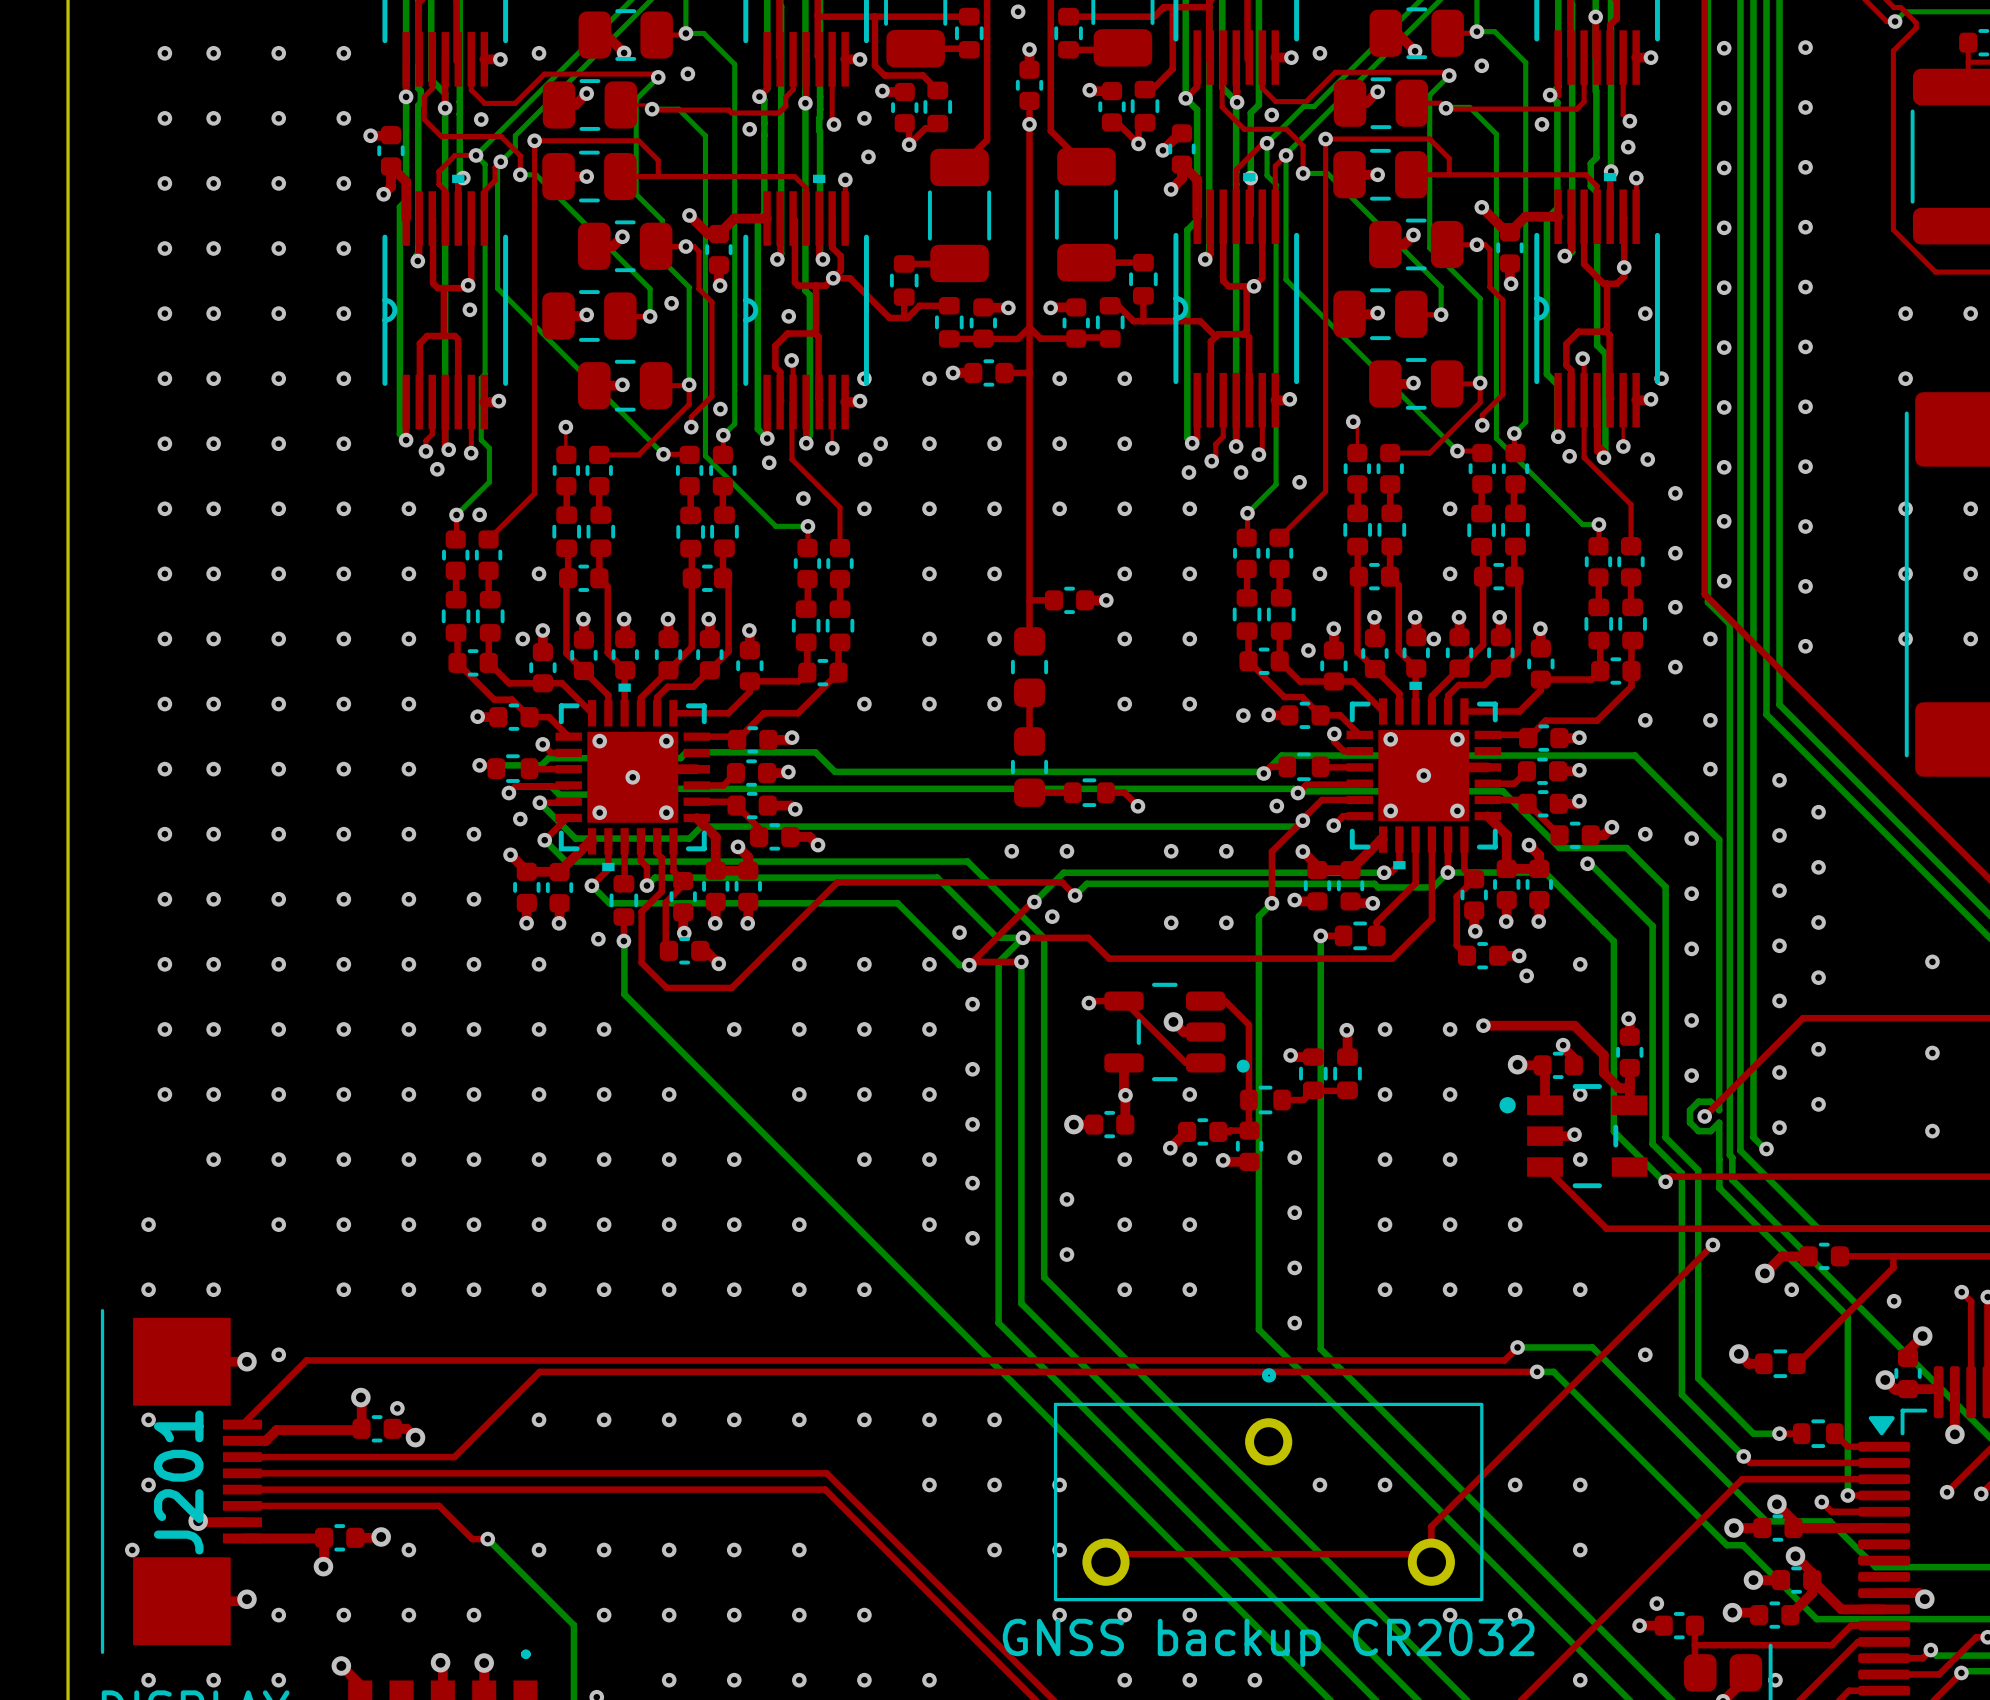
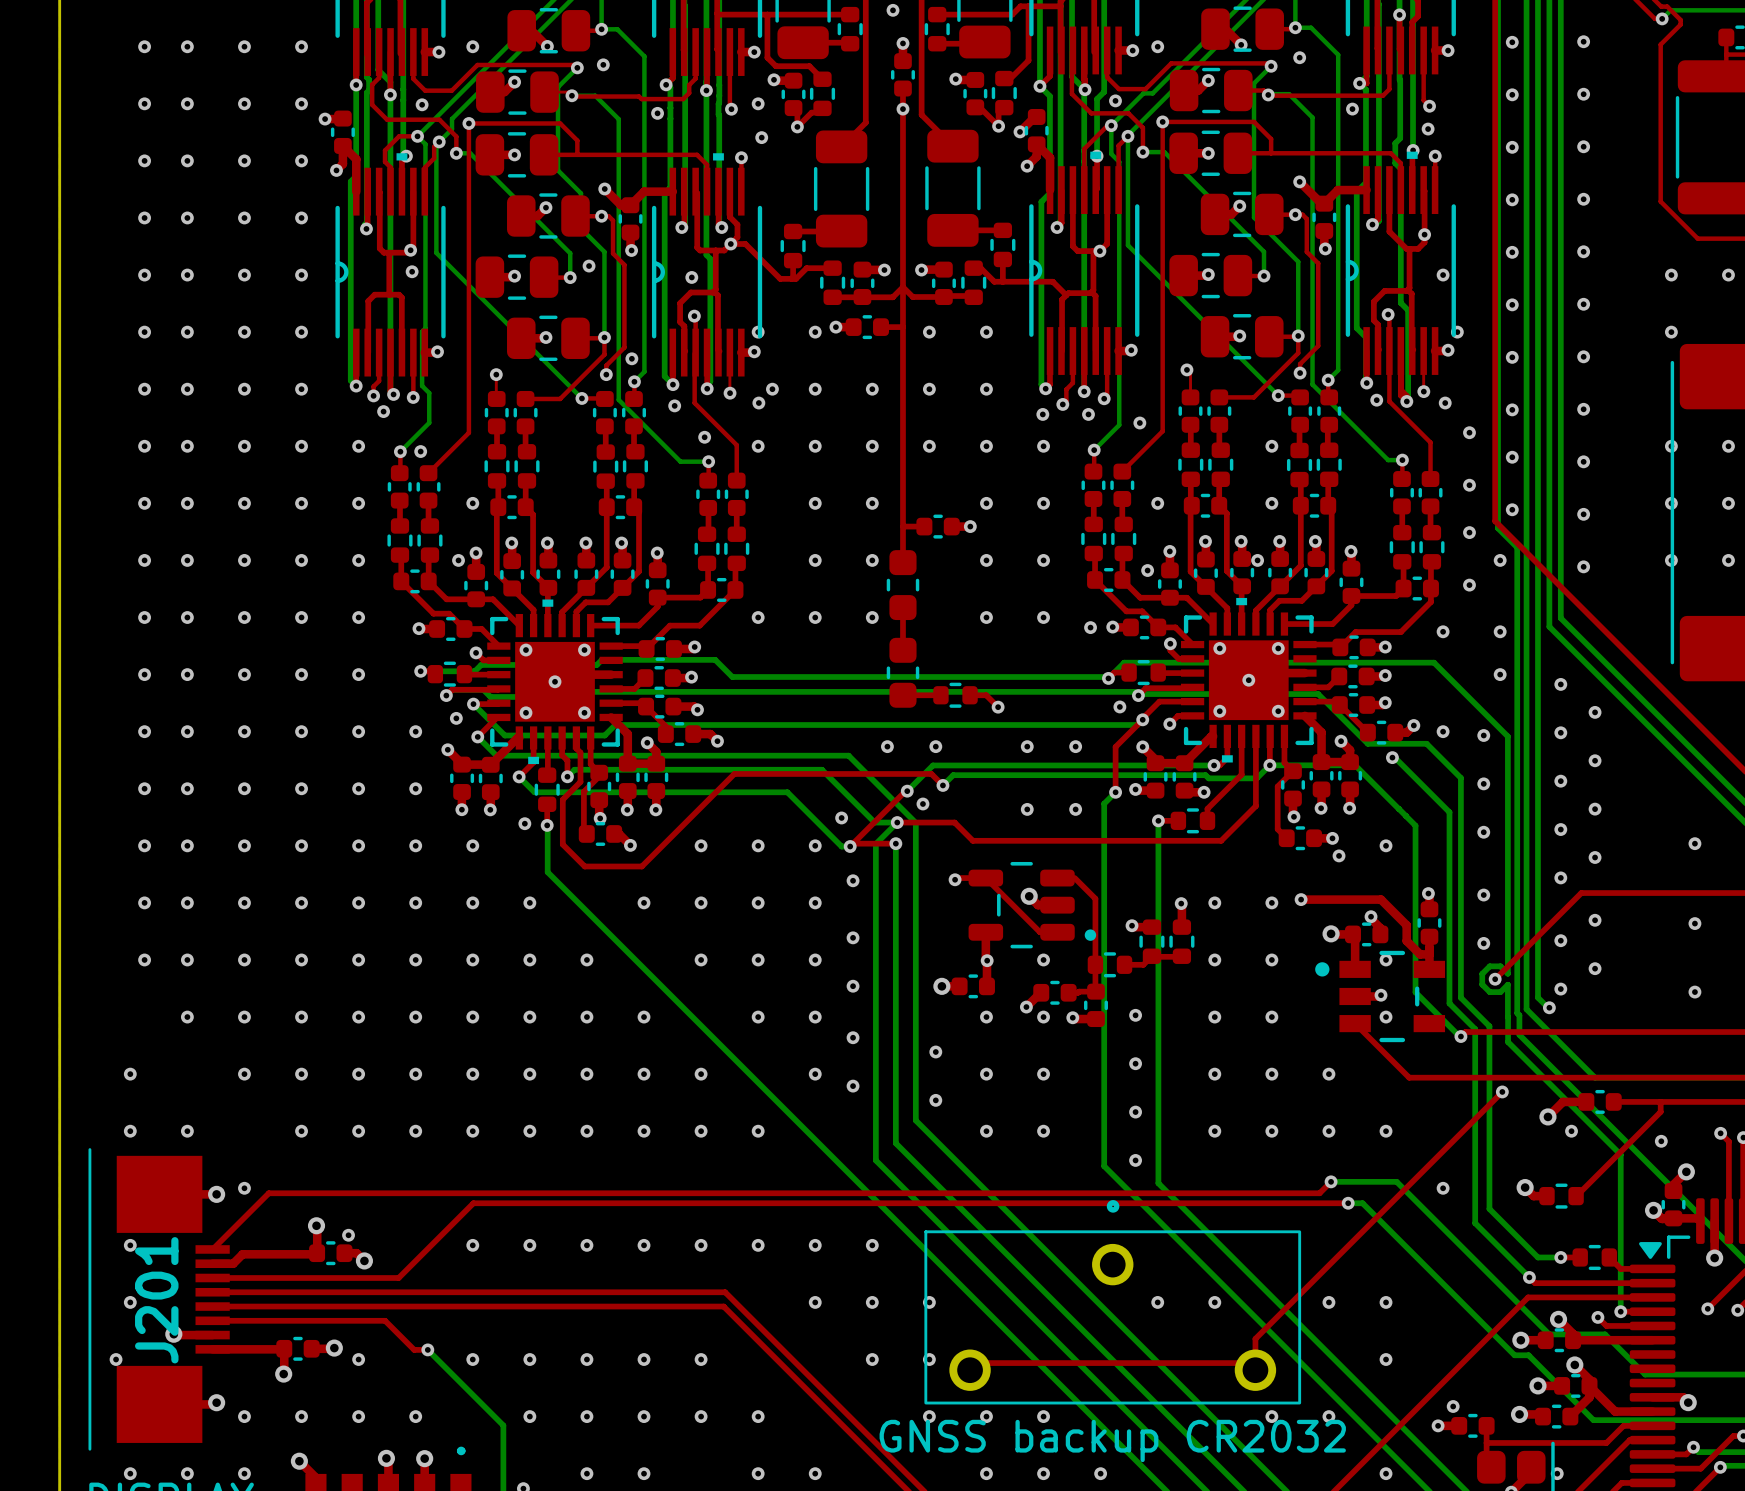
via: (799, 1680) -> none

